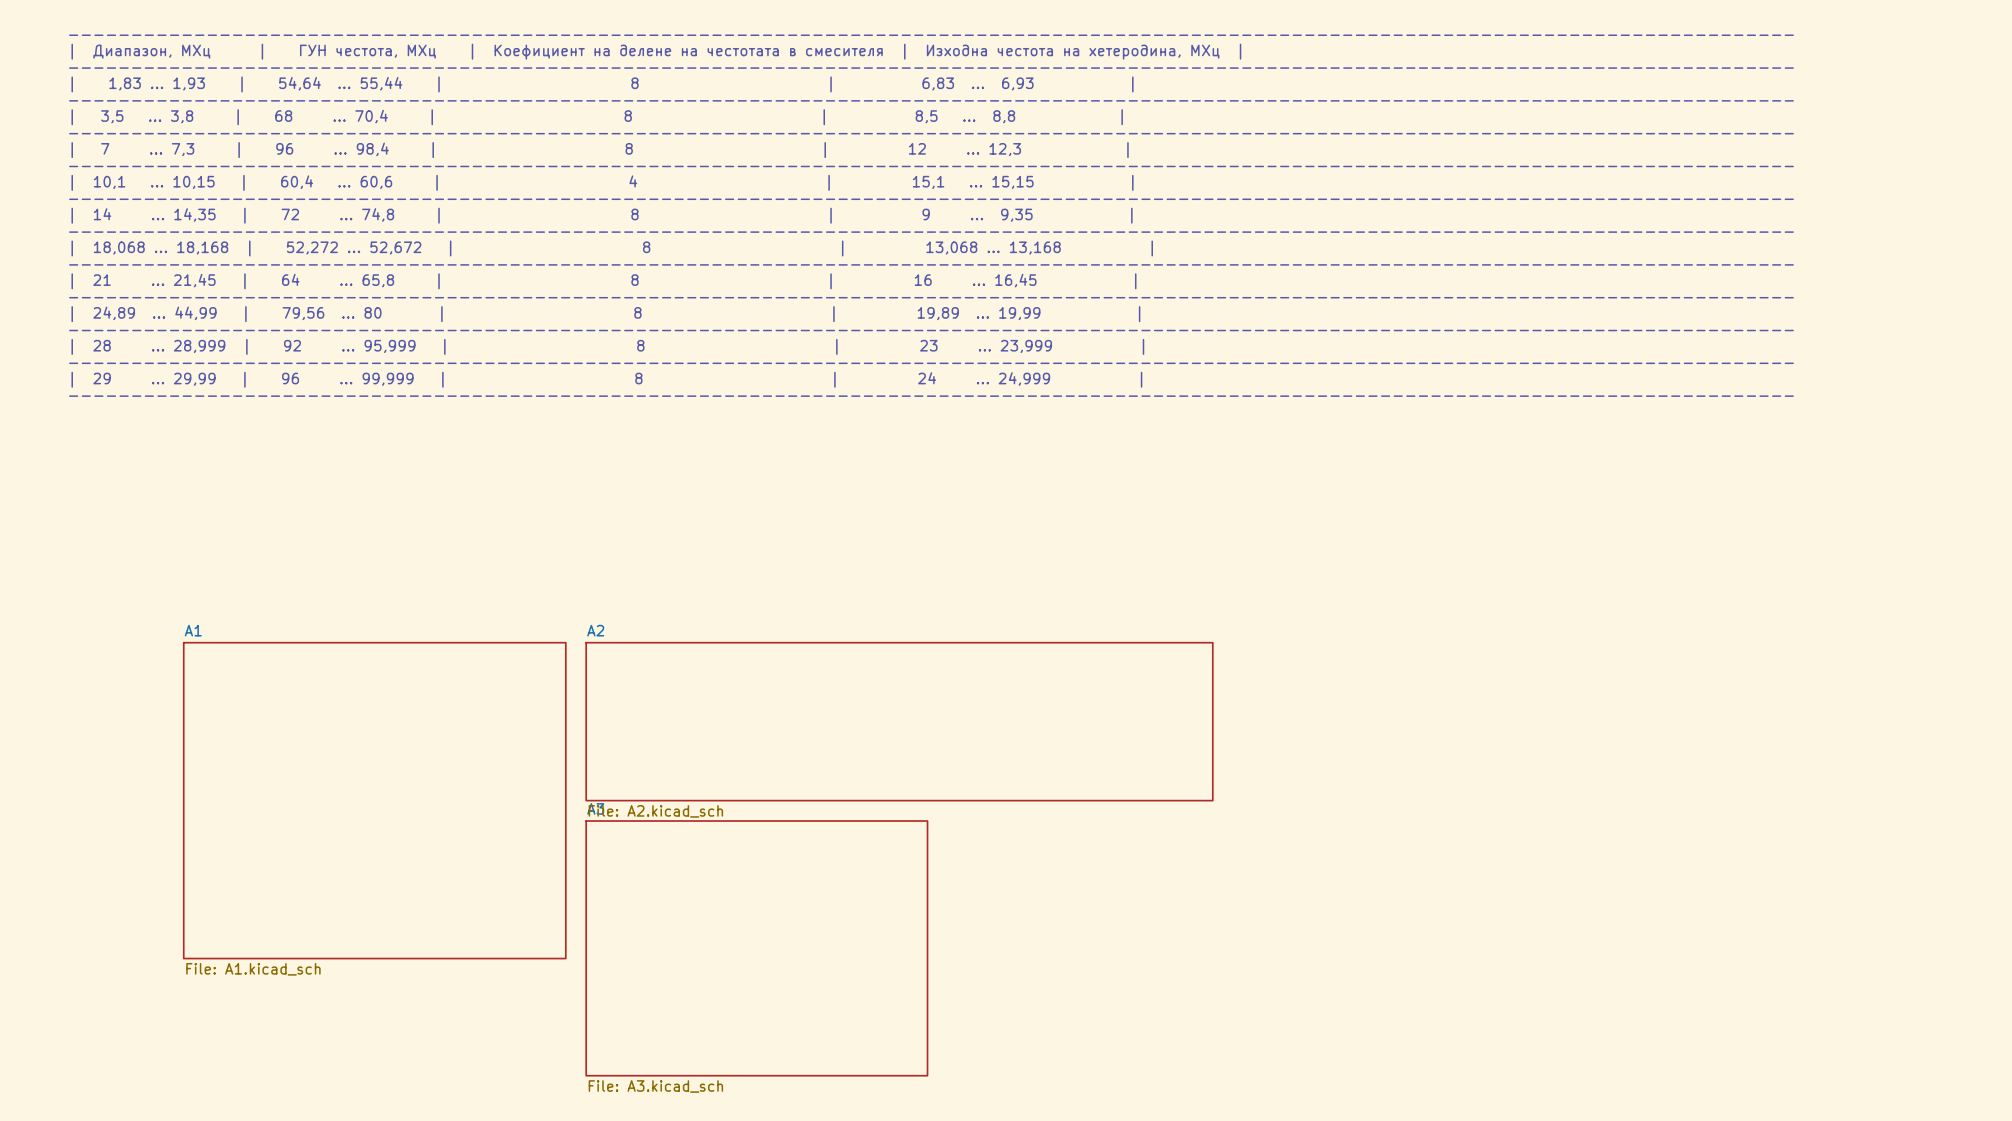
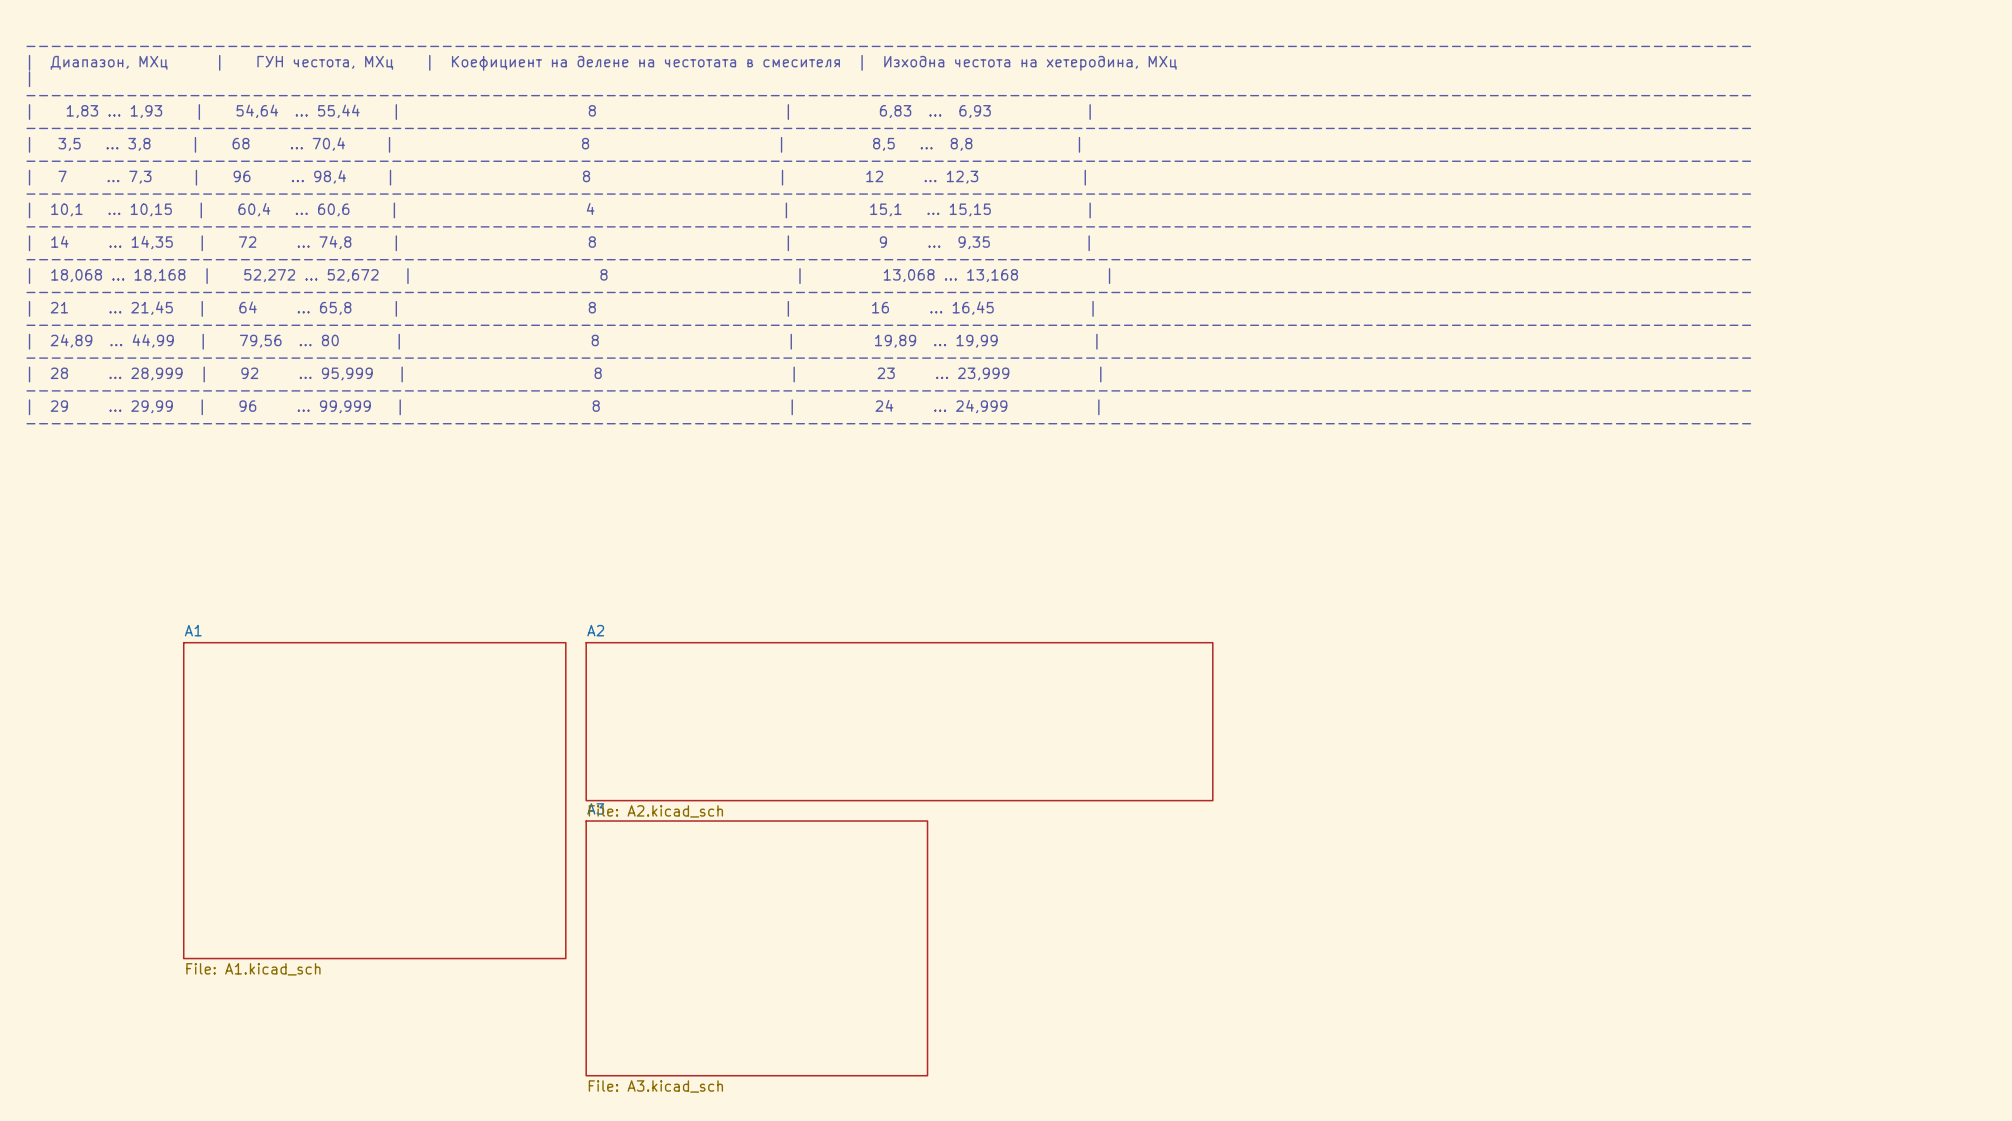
text position: ----------------------------------------------------------------------------------------------------------------------------------------- (931, 35) -> ----------------------------------------------------------------------------------------------------------------------------------------- (888, 46)
text: | Диапазон, МХц | ГУН честота, МХц | Коефициент на делене на честотата в смесителя | Изходна честота на хетеродина, МХц | (656, 51) -> | Диапазон, МХц | ГУН честота, МХц | Коефициент на делене на честотата в смесителя | Изходна честота на хетеродина, МХц (602, 62)
text: ----------------------------------------------------------------------------------------------------------------------------------------- (931, 68) -> none
text: none -> | (29, 79)
text position: | 1,83 ... 1,93 | 54,64 ... 55,44 | 8 | 6,83 ... 6,93 | (602, 84) -> | 1,83 ... 1,93 | 54,64 ... 55,44 | 8 | 6,83 ... 6,93 | (559, 112)
text position: ----------------------------------------------------------------------------------------------------------------------------------------- (931, 100) -> ----------------------------------------------------------------------------------------------------------------------------------------- (888, 95)
text position: | 3,5 ... 3,8 | 68 ... 70,4 | 8 | 8,5 ... 8,8 | (597, 117) -> | 3,5 ... 3,8 | 68 ... 70,4 | 8 | 8,5 ... 8,8 | (554, 144)
text position: ----------------------------------------------------------------------------------------------------------------------------------------- (931, 133) -> ----------------------------------------------------------------------------------------------------------------------------------------- (888, 128)
text position: | 7 ... 7,3 | 96 ... 98,4 | 8 | 12 ... 12,3 | (600, 150) -> | 7 ... 7,3 | 96 ... 98,4 | 8 | 12 ... 12,3 | (557, 177)
text position: ----------------------------------------------------------------------------------------------------------------------------------------- (931, 166) -> ----------------------------------------------------------------------------------------------------------------------------------------- (888, 161)
text position: | 10,1 ... 10,15 | 60,4 ... 60,6 | 4 | 15,1 ... 15,15 | (602, 182) -> | 10,1 ... 10,15 | 60,4 ... 60,6 | 4 | 15,1 ... 15,15 | (559, 210)
text position: ----------------------------------------------------------------------------------------------------------------------------------------- (931, 199) -> ----------------------------------------------------------------------------------------------------------------------------------------- (888, 194)
text position: | 14 ... 14,35 | 72 ... 74,8 | 8 | 9 ... 9,35 | (602, 215) -> | 14 ... 14,35 | 72 ... 74,8 | 8 | 9 ... 9,35 | (559, 243)
text position: ----------------------------------------------------------------------------------------------------------------------------------------- (931, 232) -> ----------------------------------------------------------------------------------------------------------------------------------------- (888, 226)
text position: | 18,068 ... 18,168 | 52,272 ... 52,672 | 8 | 13,068 ... 13,168 | (612, 248) -> | 18,068 ... 18,168 | 52,272 ... 52,672 | 8 | 13,068 ... 13,168 | (569, 276)
text position: ----------------------------------------------------------------------------------------------------------------------------------------- (931, 264) -> ----------------------------------------------------------------------------------------------------------------------------------------- (888, 259)
text position: | 21 ... 21,45 | 64 ... 65,8 | 8 | 16 ... 16,45 | (603, 281) -> | 21 ... 21,45 | 64 ... 65,8 | 8 | 16 ... 16,45 | (561, 308)
text position: ----------------------------------------------------------------------------------------------------------------------------------------- (931, 297) -> ----------------------------------------------------------------------------------------------------------------------------------------- (888, 292)
text position: | 24,89 ... 44,99 | 79,56 ... 80 | 8 | 19,89 ... 19,99 | (605, 314) -> | 24,89 ... 44,99 | 79,56 ... 80 | 8 | 19,89 ... 19,99 | (563, 341)
text position: ----------------------------------------------------------------------------------------------------------------------------------------- (931, 330) -> ----------------------------------------------------------------------------------------------------------------------------------------- (888, 325)
text position: | 28 ... 28,999 | 92 ... 95,999 | 8 | 23 ... 23,999 | (607, 346) -> | 28 ... 28,999 | 92 ... 95,999 | 8 | 23 ... 23,999 | (565, 374)
text position: ----------------------------------------------------------------------------------------------------------------------------------------- (931, 363) -> ----------------------------------------------------------------------------------------------------------------------------------------- (888, 358)
text position: | 29 ... 29,99 | 96 ... 99,999 | 8 | 24 ... 24,999 | (606, 379) -> | 29 ... 29,99 | 96 ... 99,999 | 8 | 24 ... 24,999 | (564, 407)
text position: ----------------------------------------------------------------------------------------------------------------------------------------- (931, 396) -> ----------------------------------------------------------------------------------------------------------------------------------------- (888, 390)
text: none -> ----------------------------------------------------------------------------------------------------------------------------------------- (888, 423)

